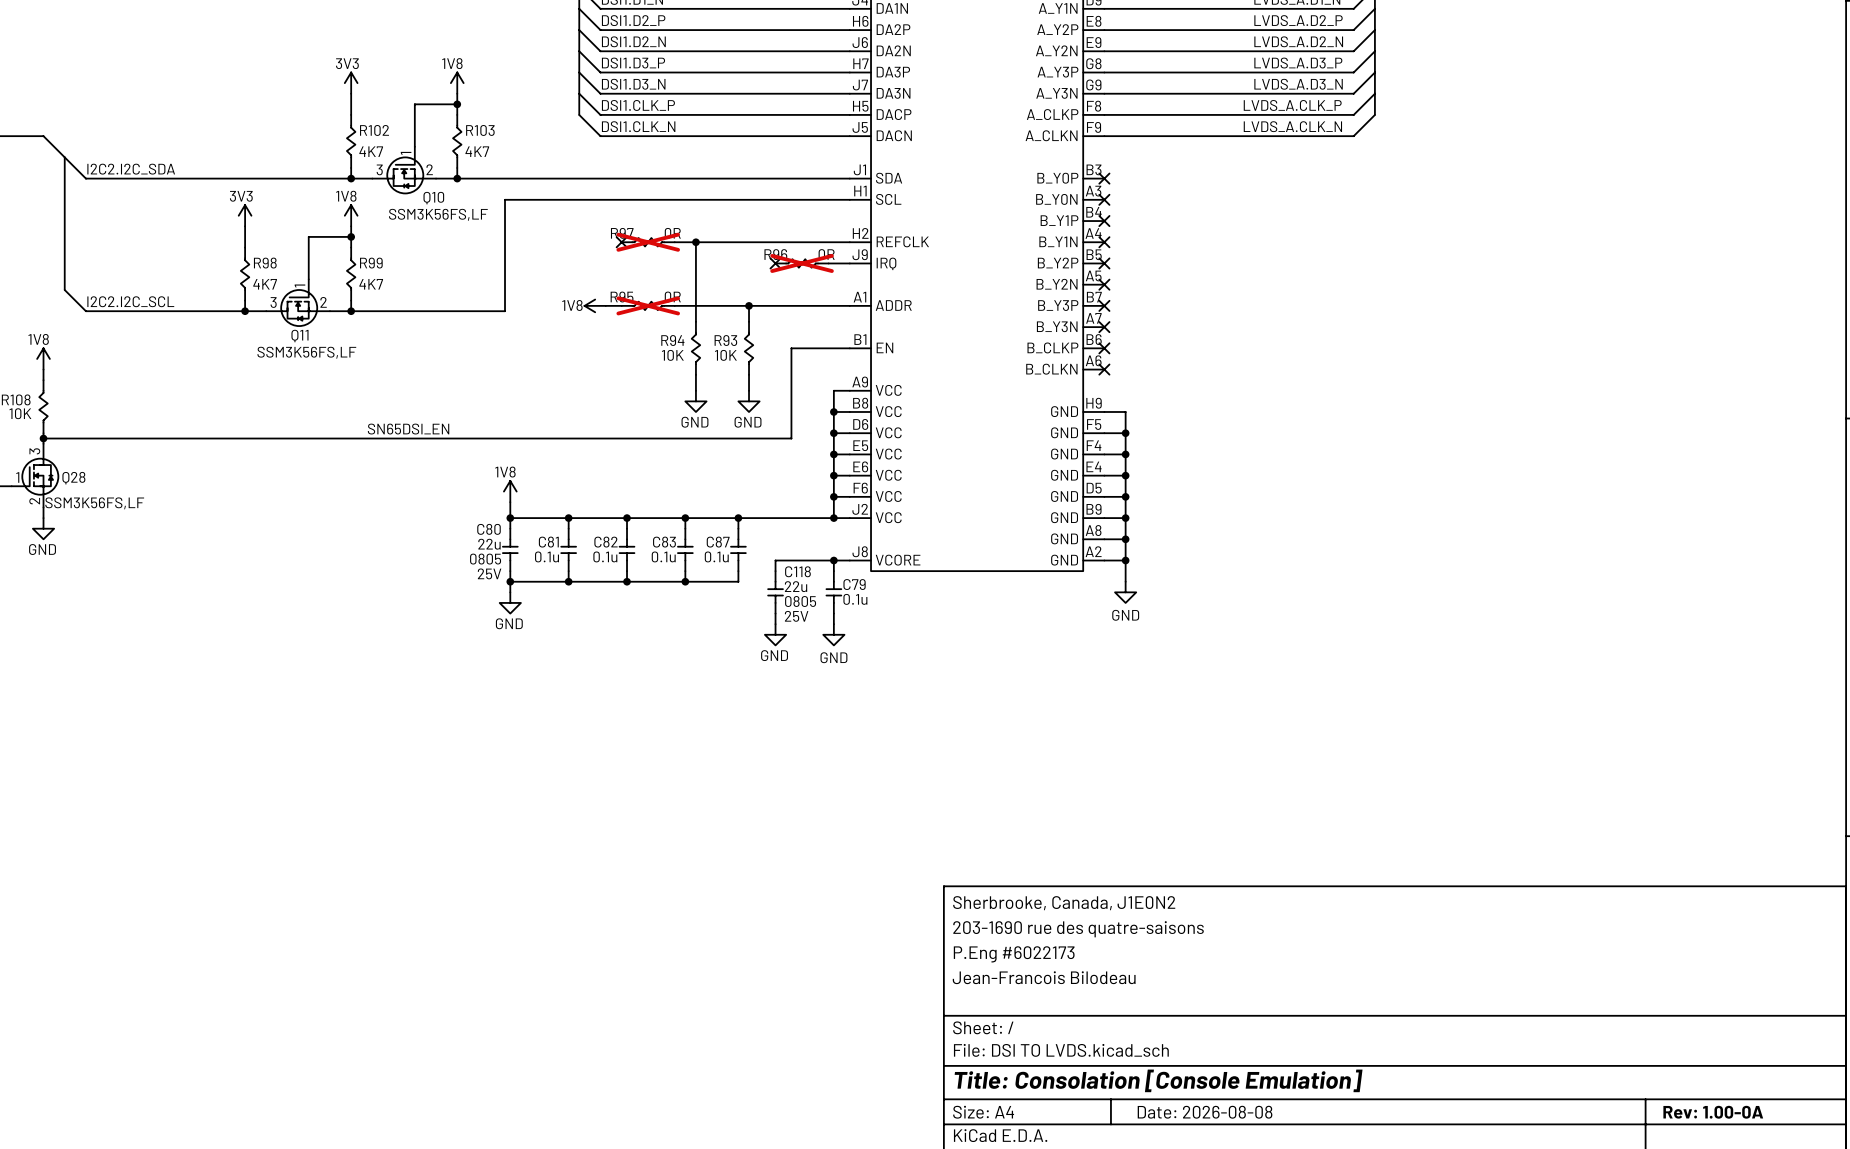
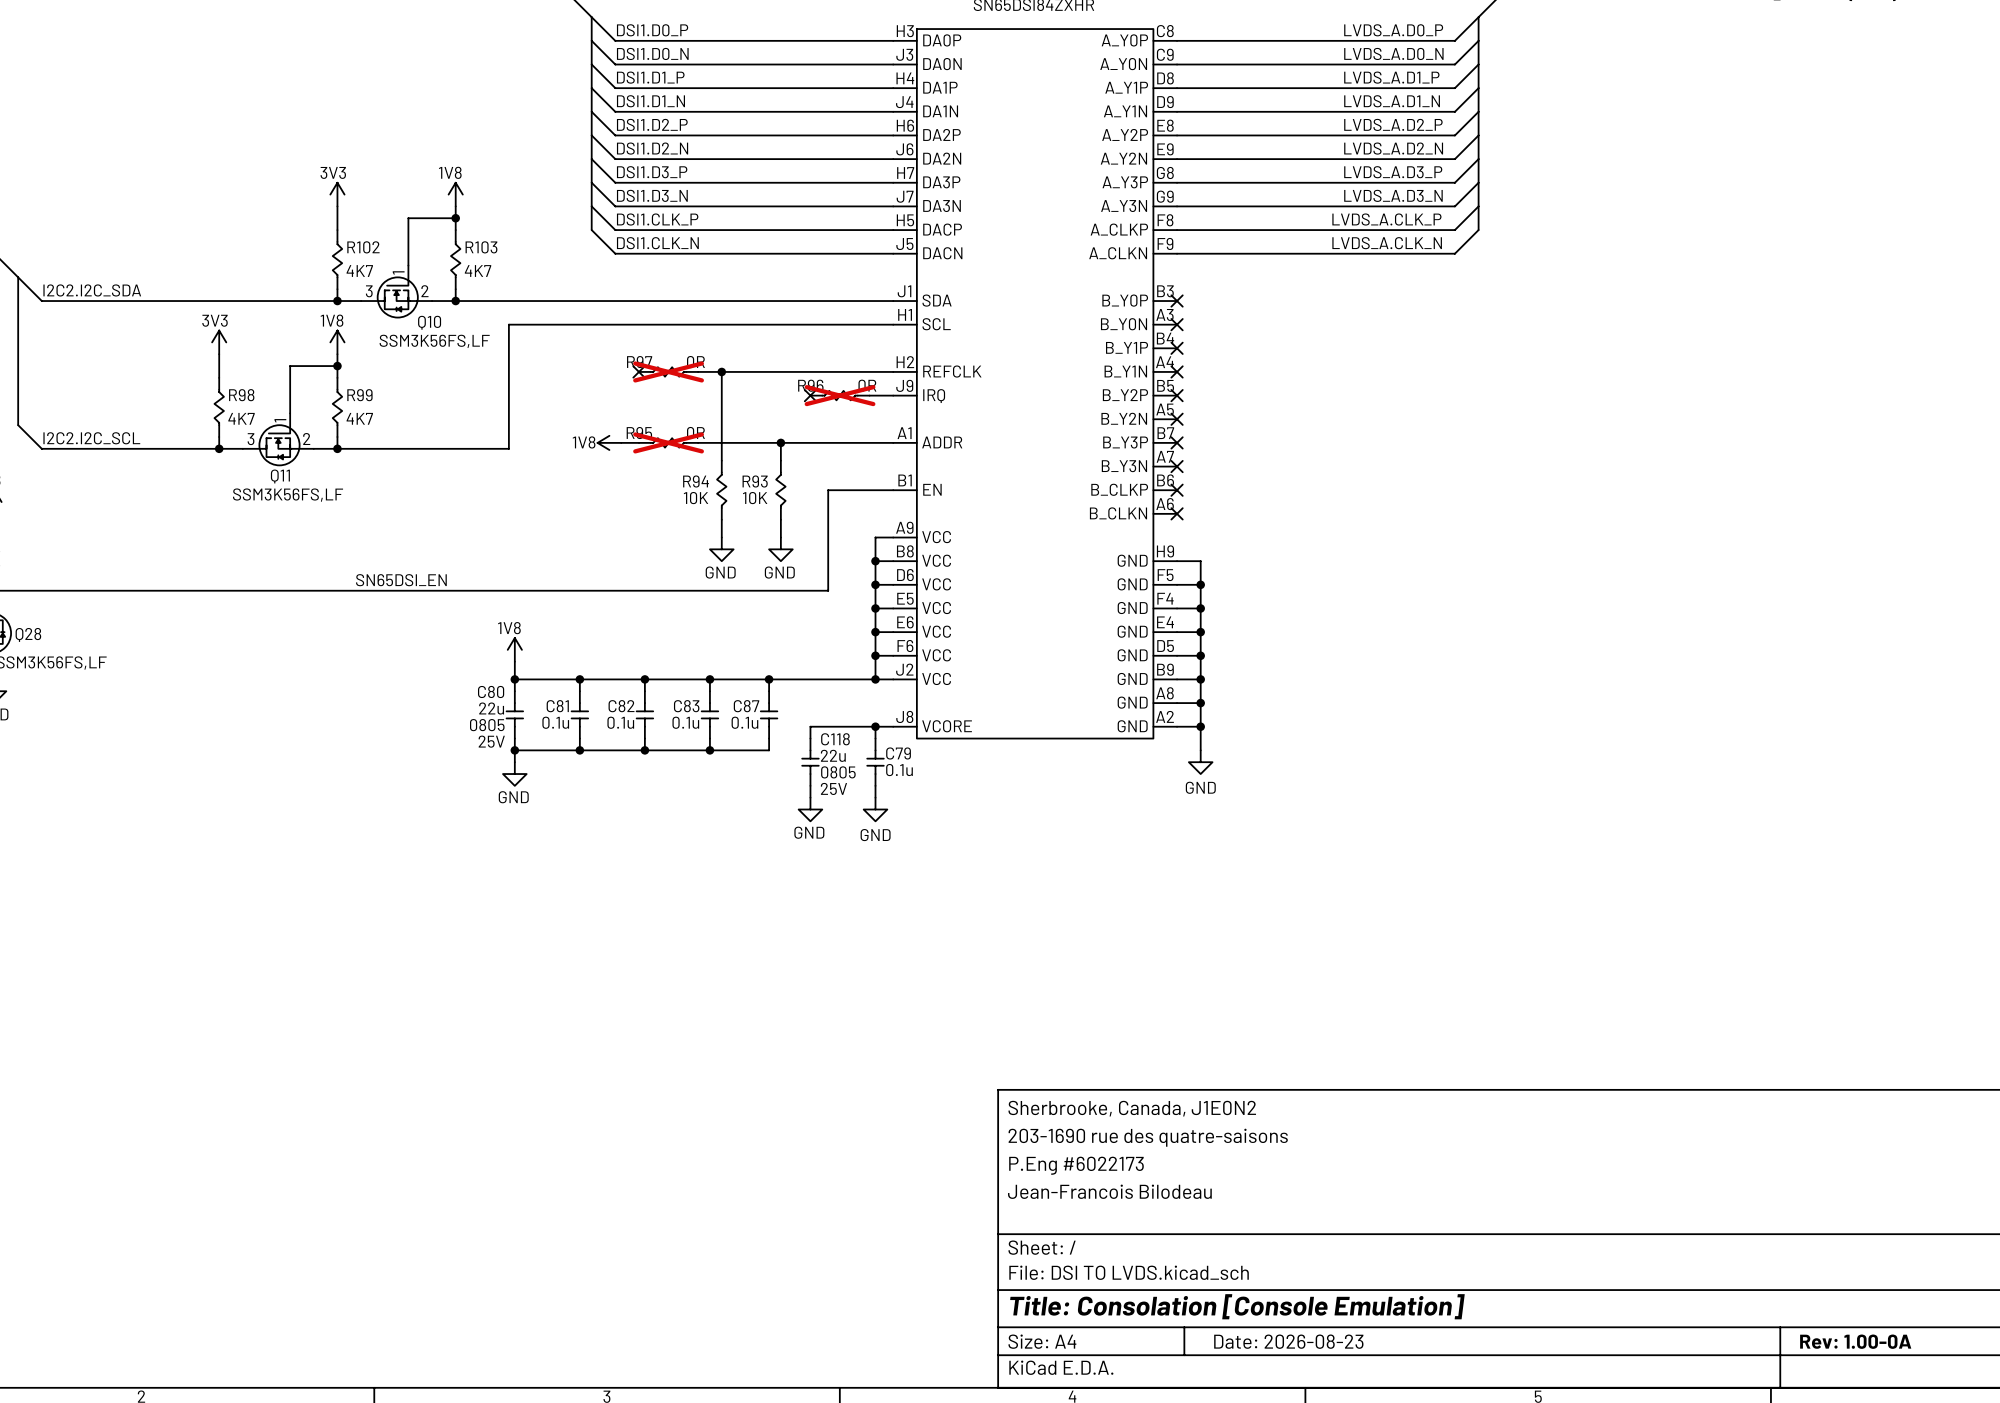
title block: Date: 2026-08-08 (1205, 1112) -> Date: 2026-08-23 (1288, 1341)

